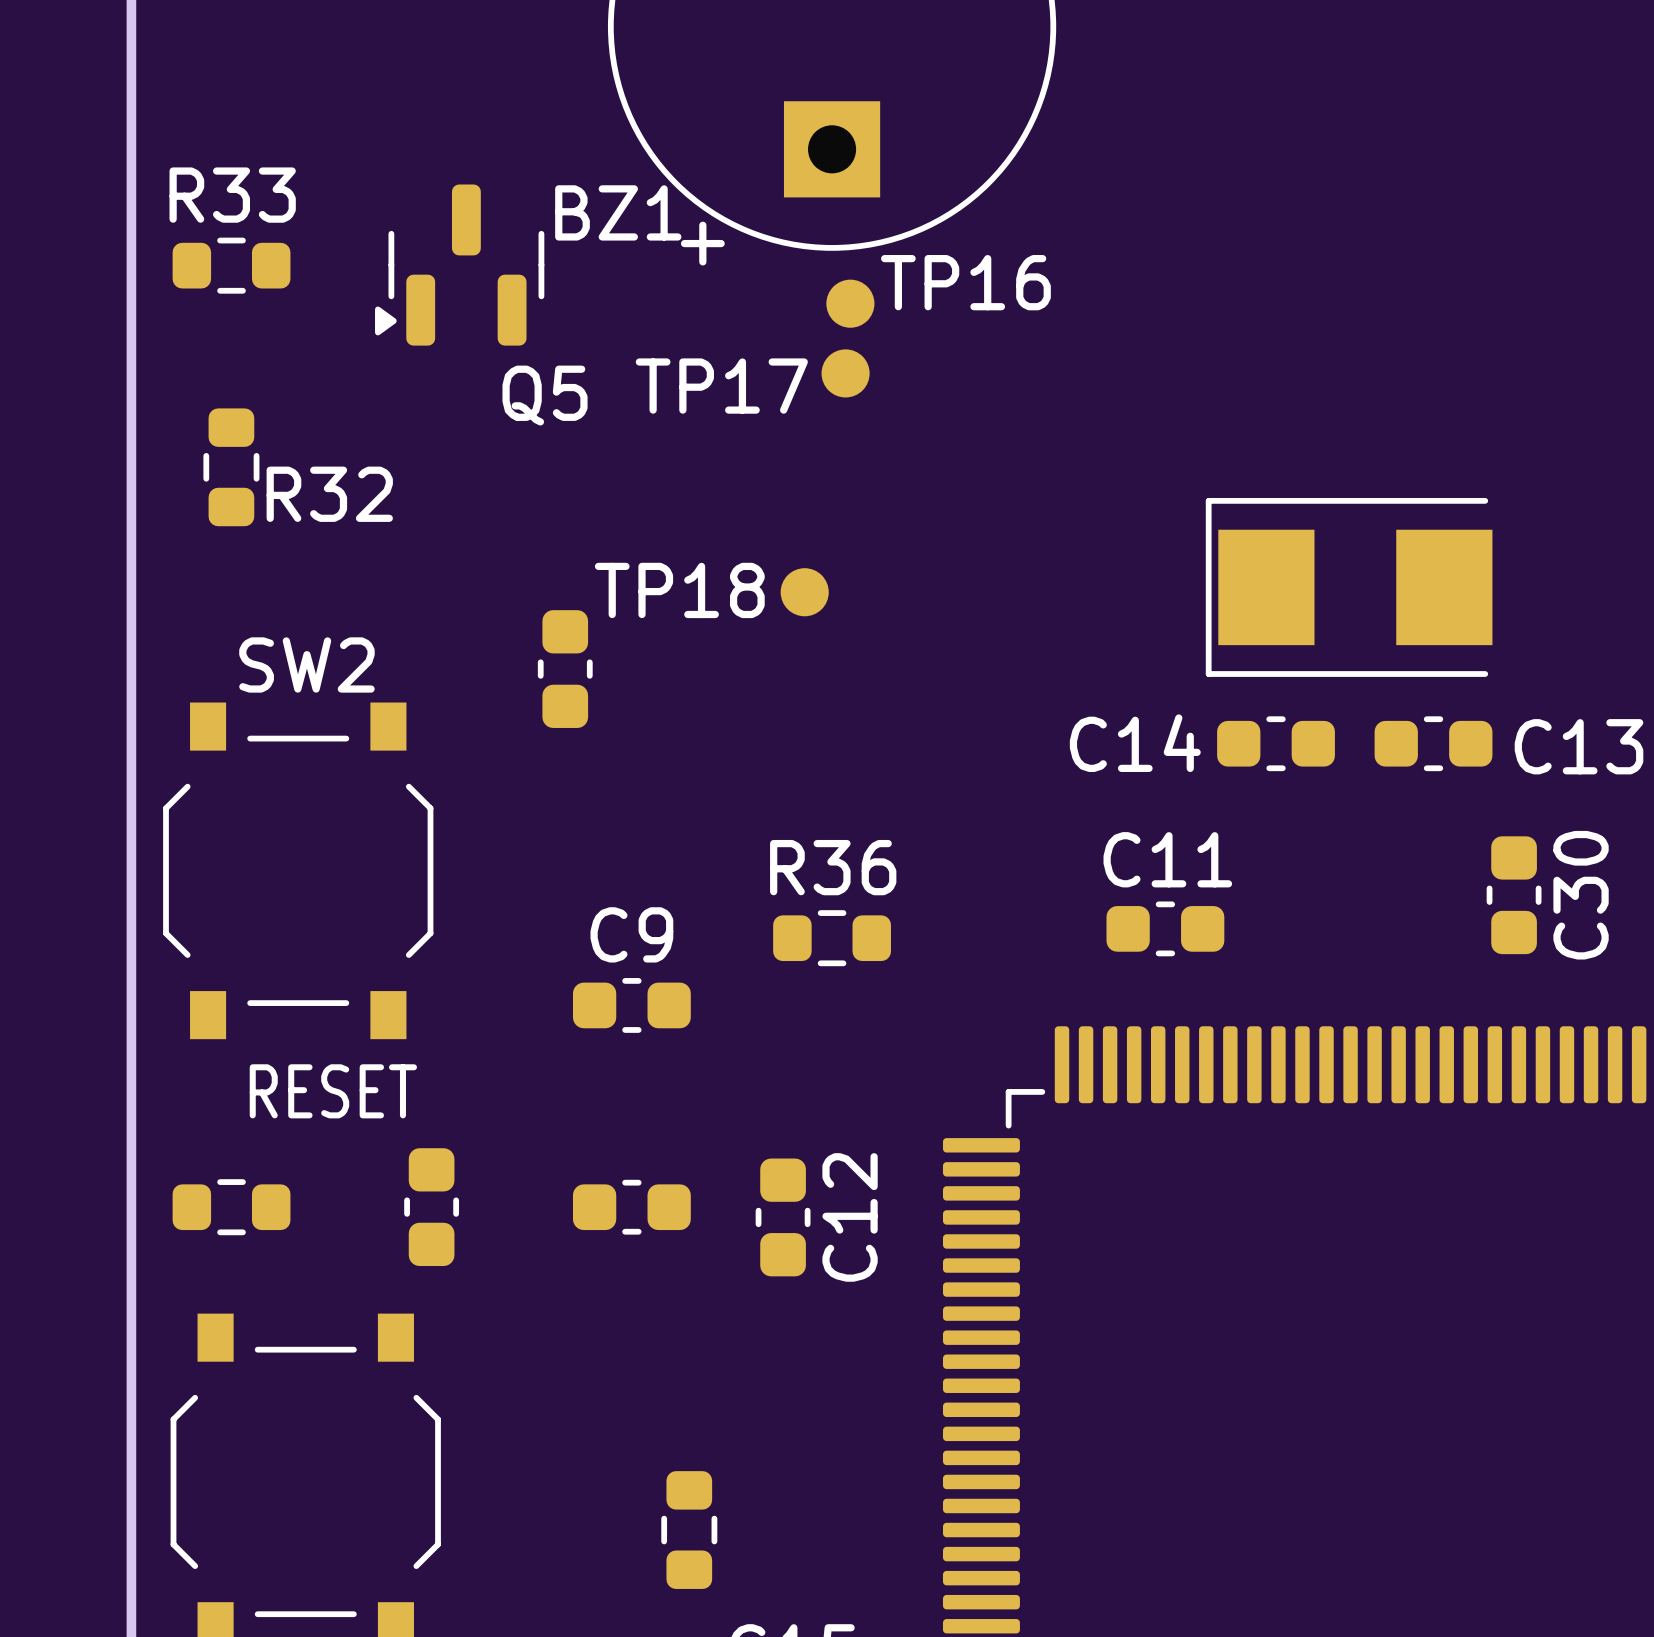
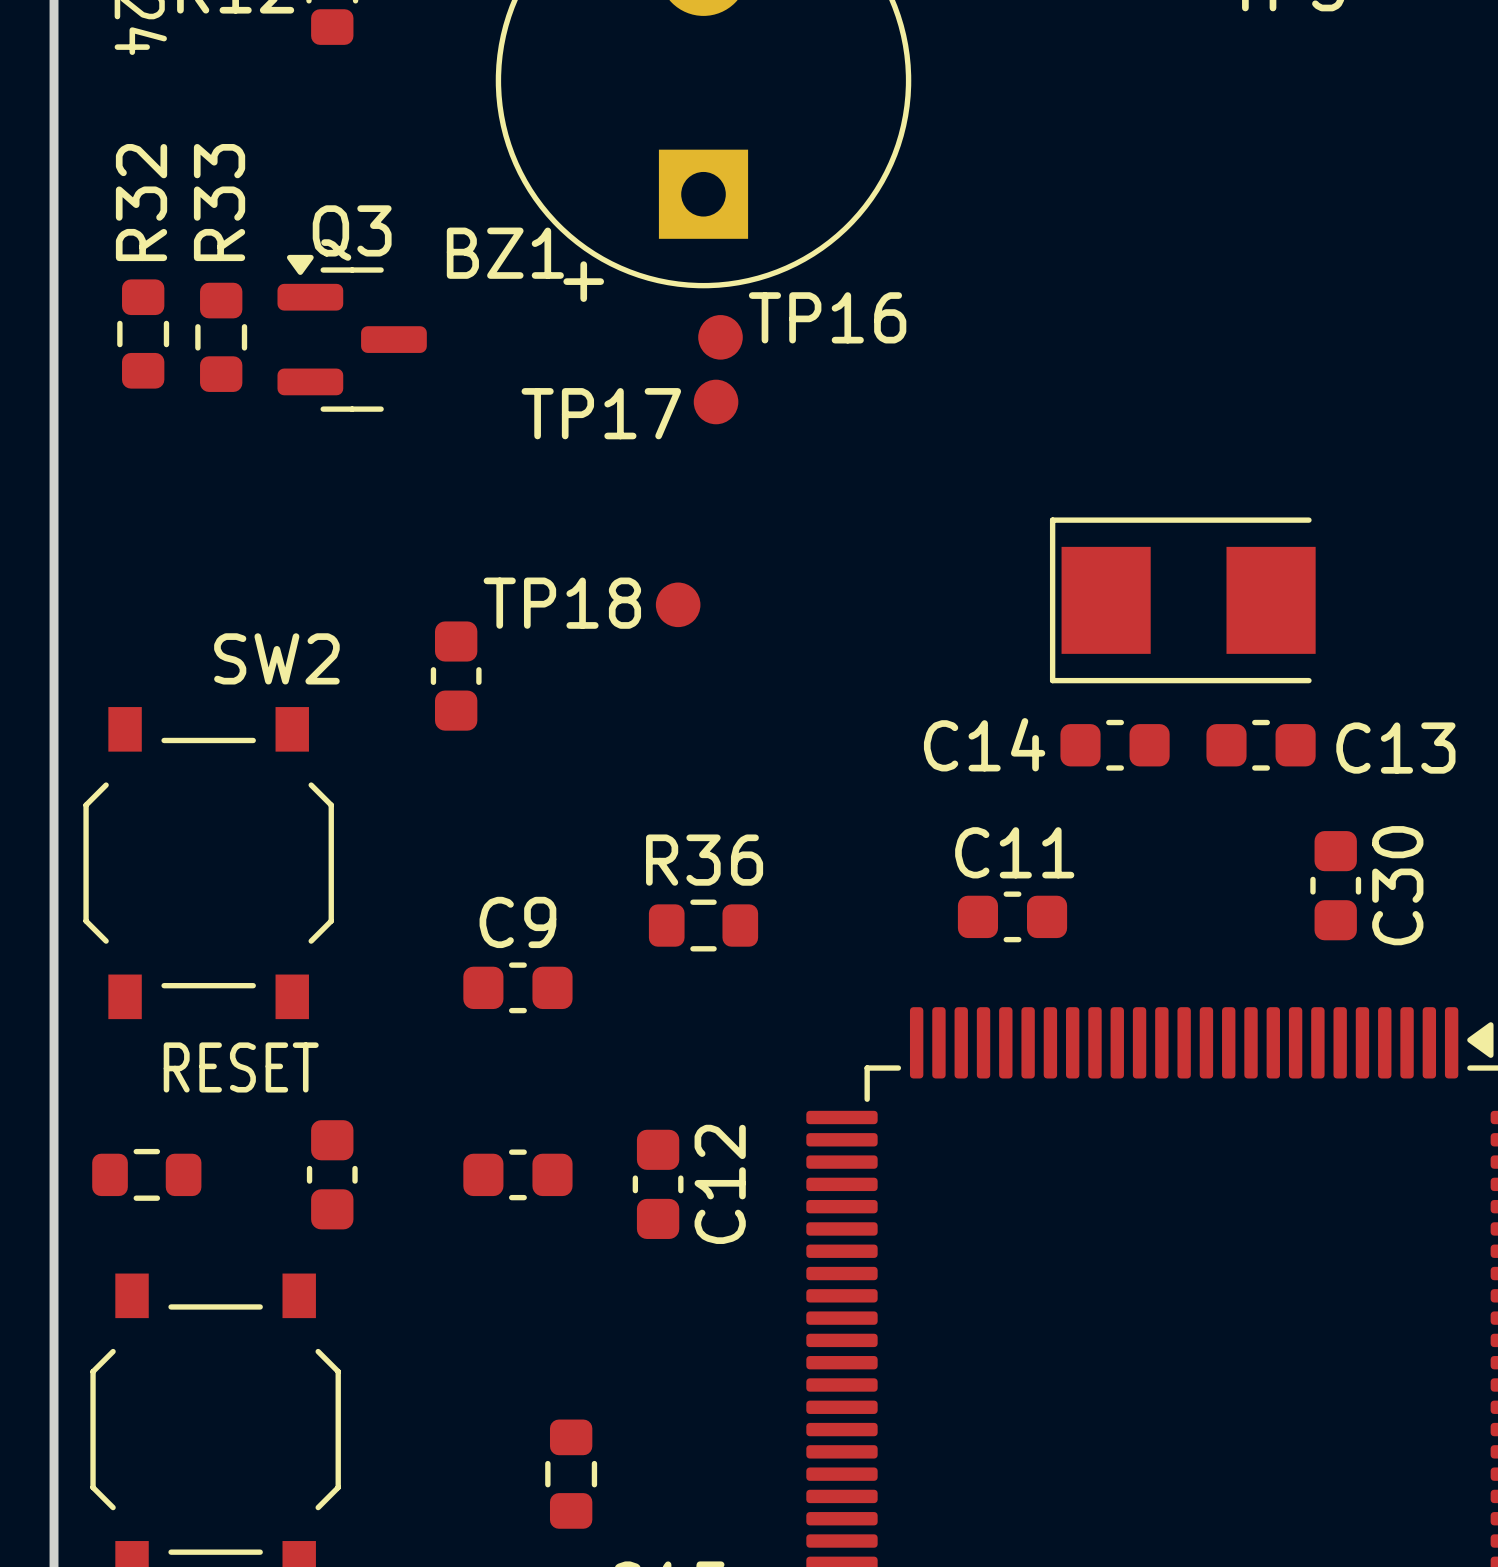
R33 rotation: 0° (231, 265) -> 90° clockwise (221, 337)
R33 position: (231, 265) -> (221, 337)
Q5: (459, 265) -> none
Q3: none -> (352, 333)
R32 position: (231, 467) -> (143, 334)
R32 name rotation: 0° (329, 494) -> 90° counterclockwise (141, 202)
R32 name position: R32 (329, 494) -> R32 (141, 202)
SW2 name position: SW2 (306, 664) -> SW2 (276, 658)

